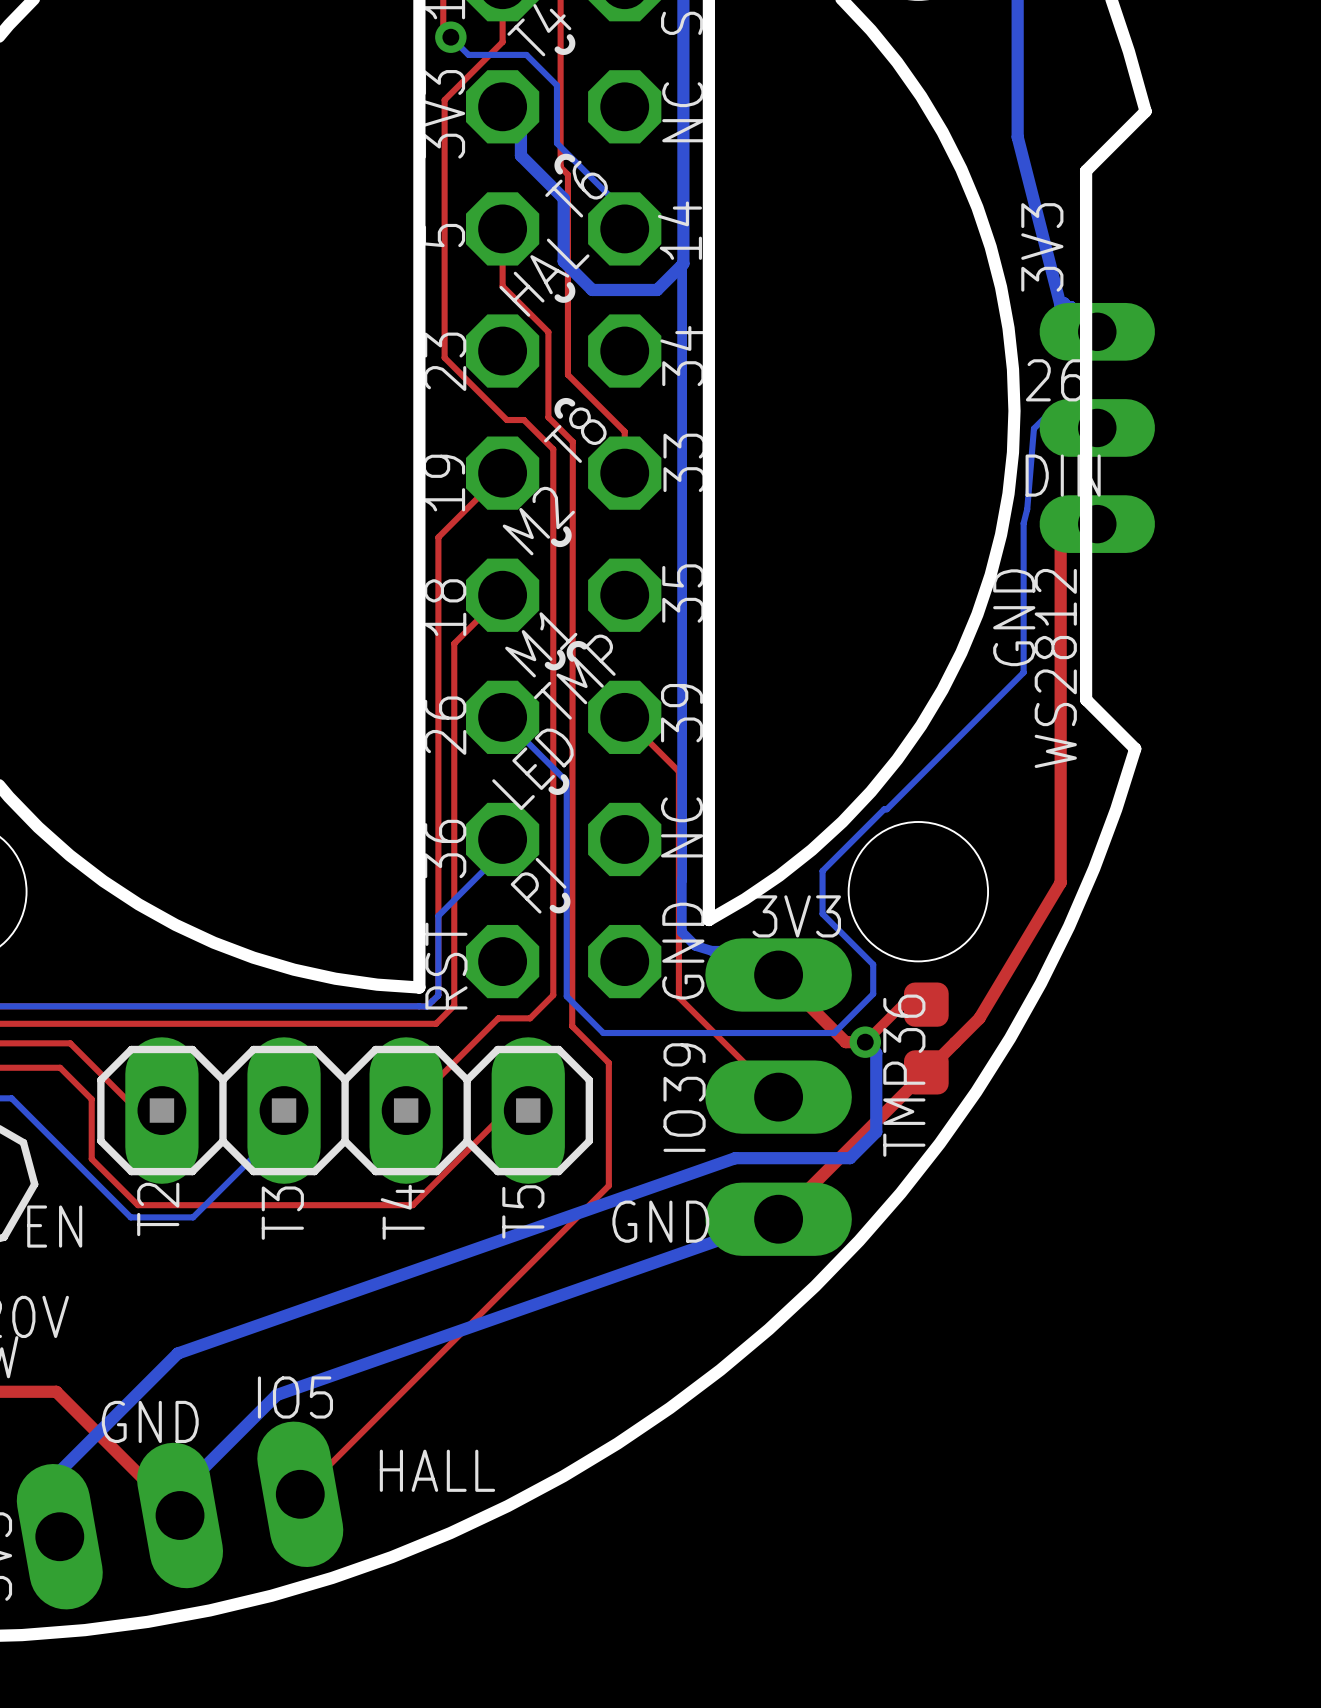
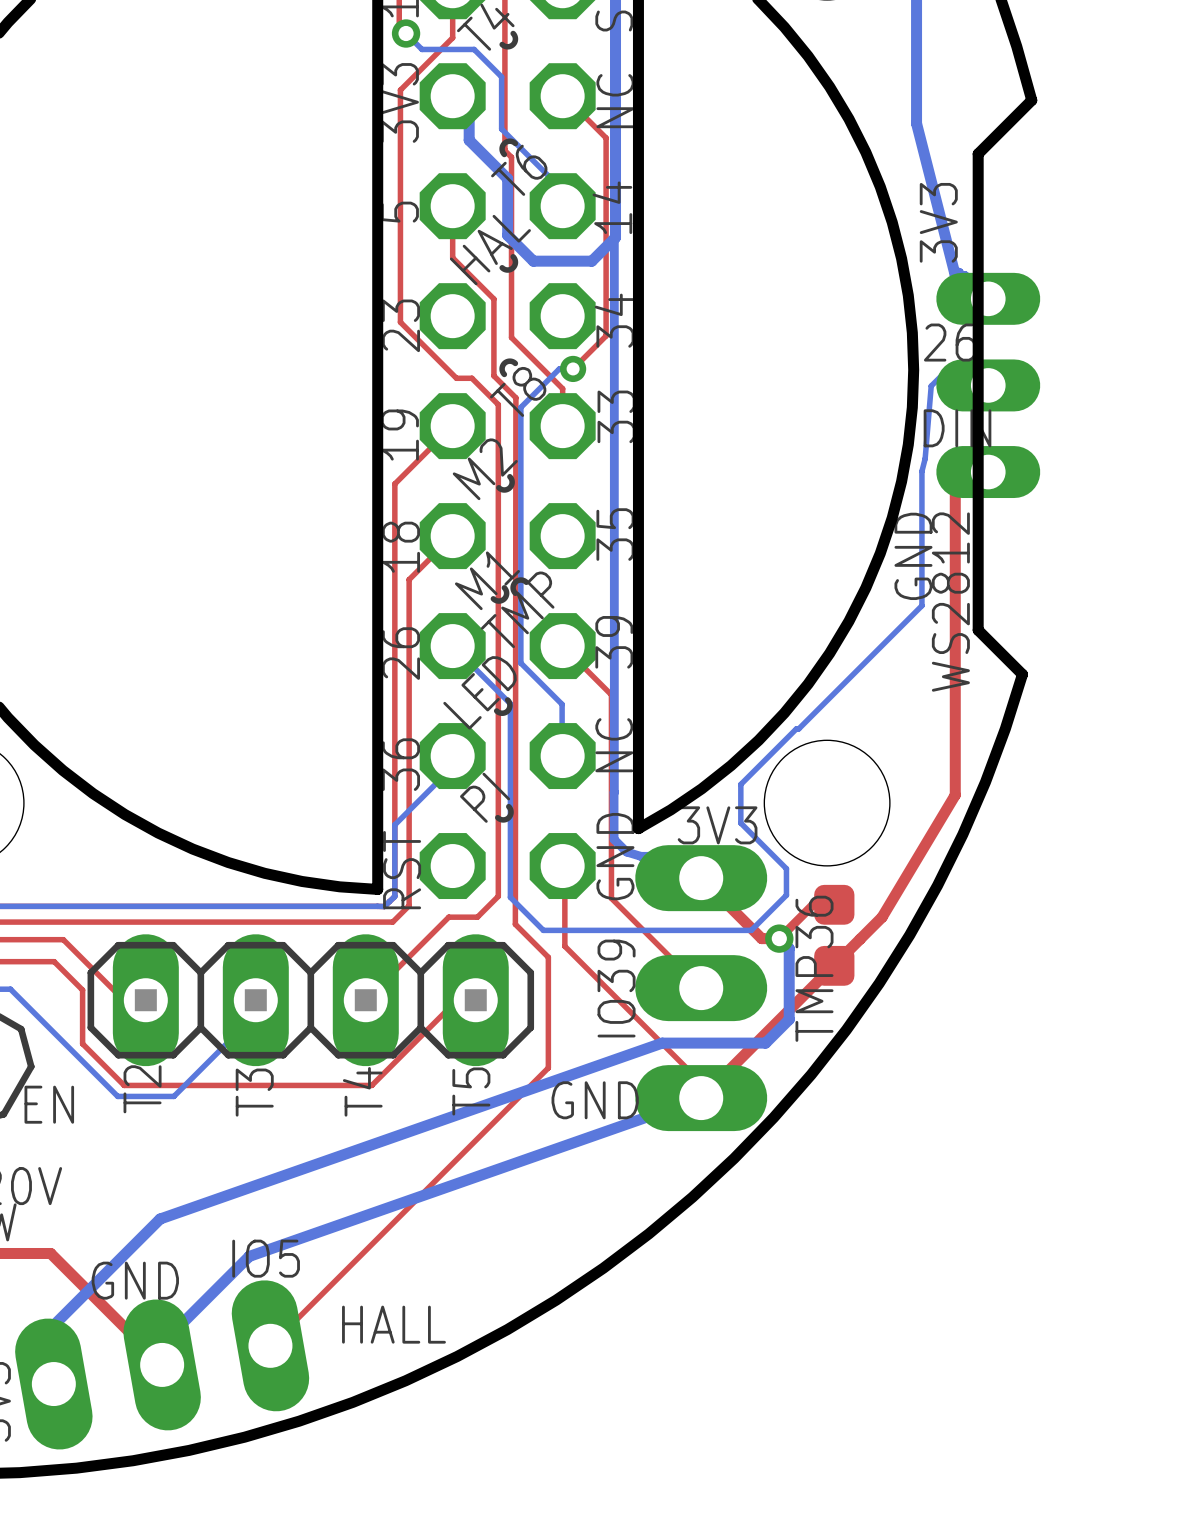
top track: none -> (562, 96) (606, 137) (606, 335) (573, 368)
bottom track: none -> (573, 368) (559, 368) (520, 407) (520, 663) (562, 704) (562, 756)
via: none -> (573, 368)
top track: none -> (562, 866) (564, 866) (564, 946) (705, 1086) (701, 1098)

